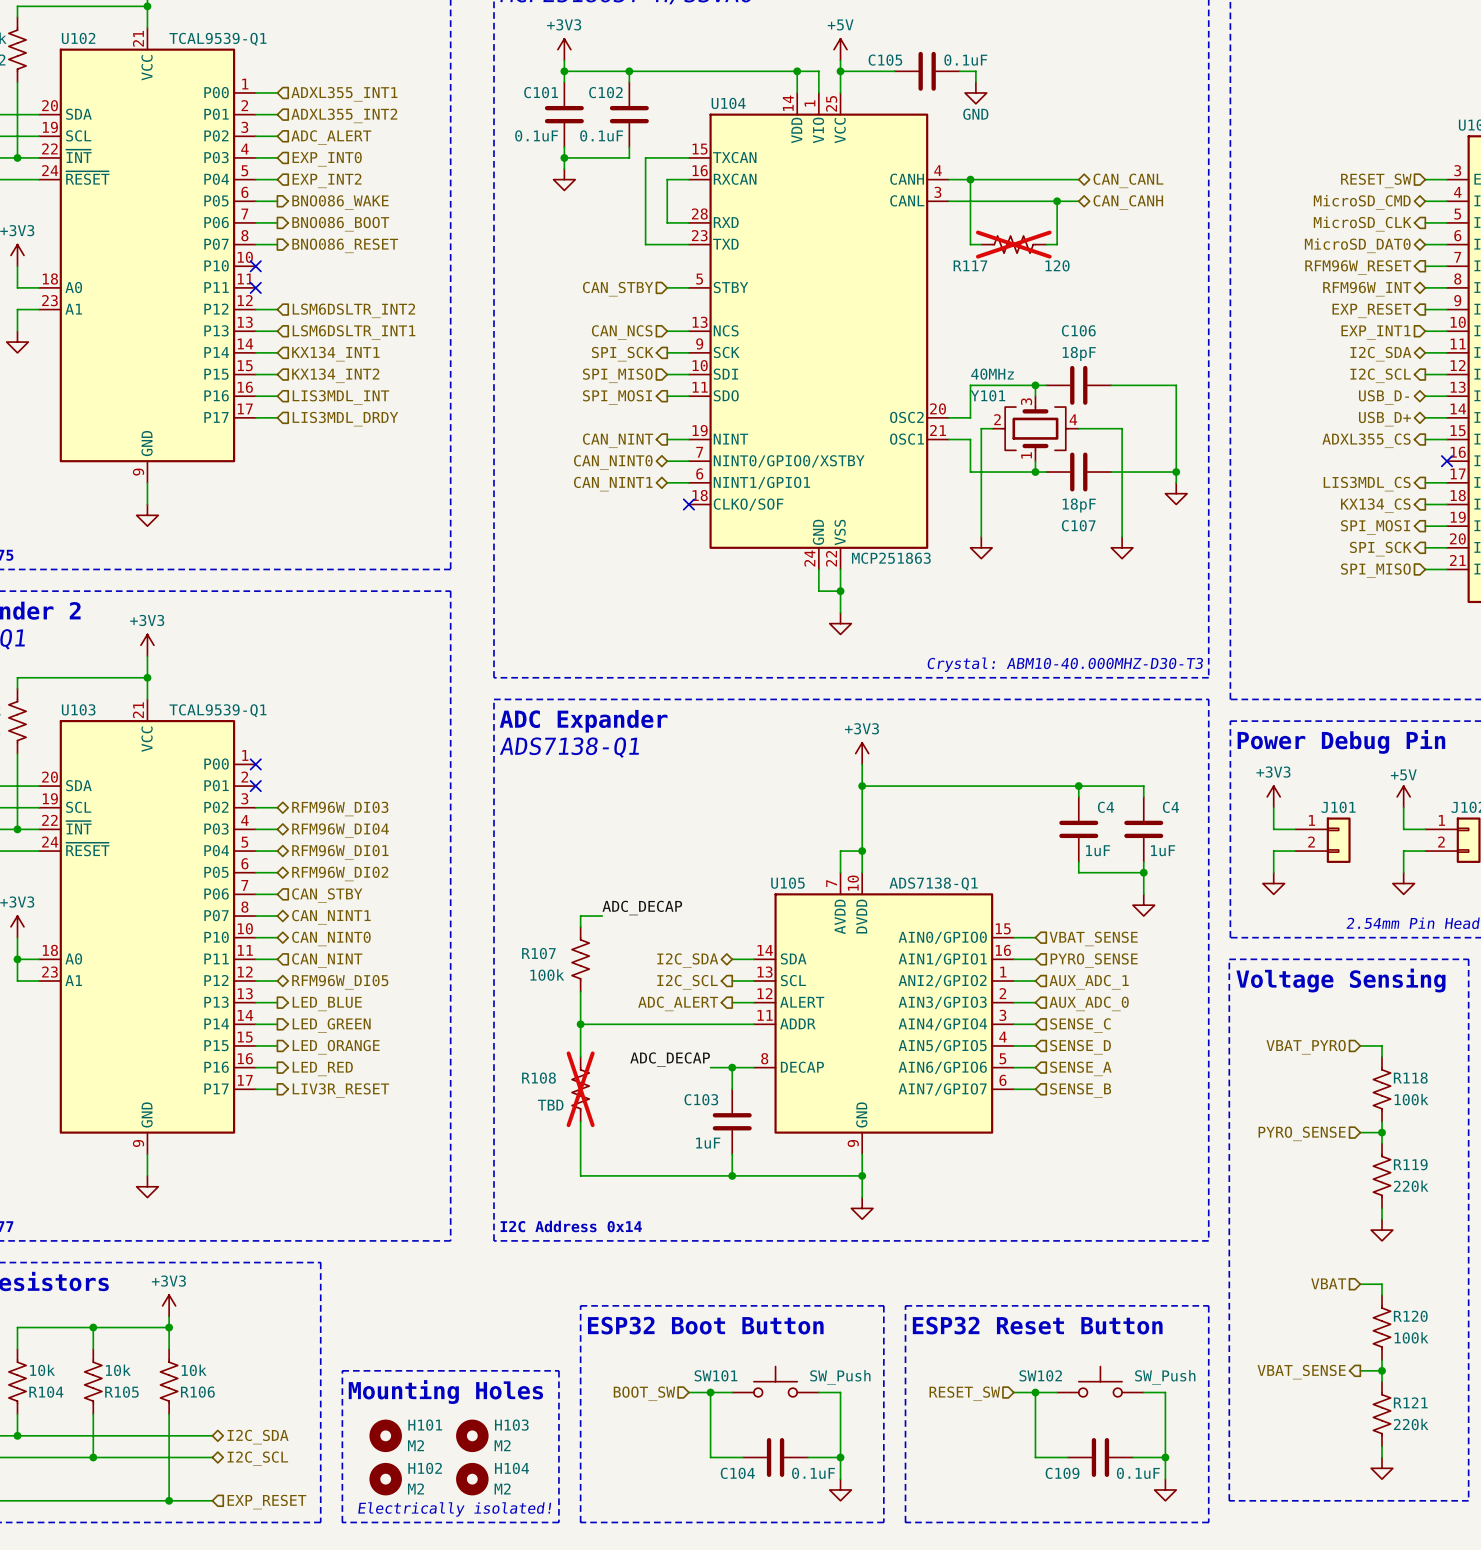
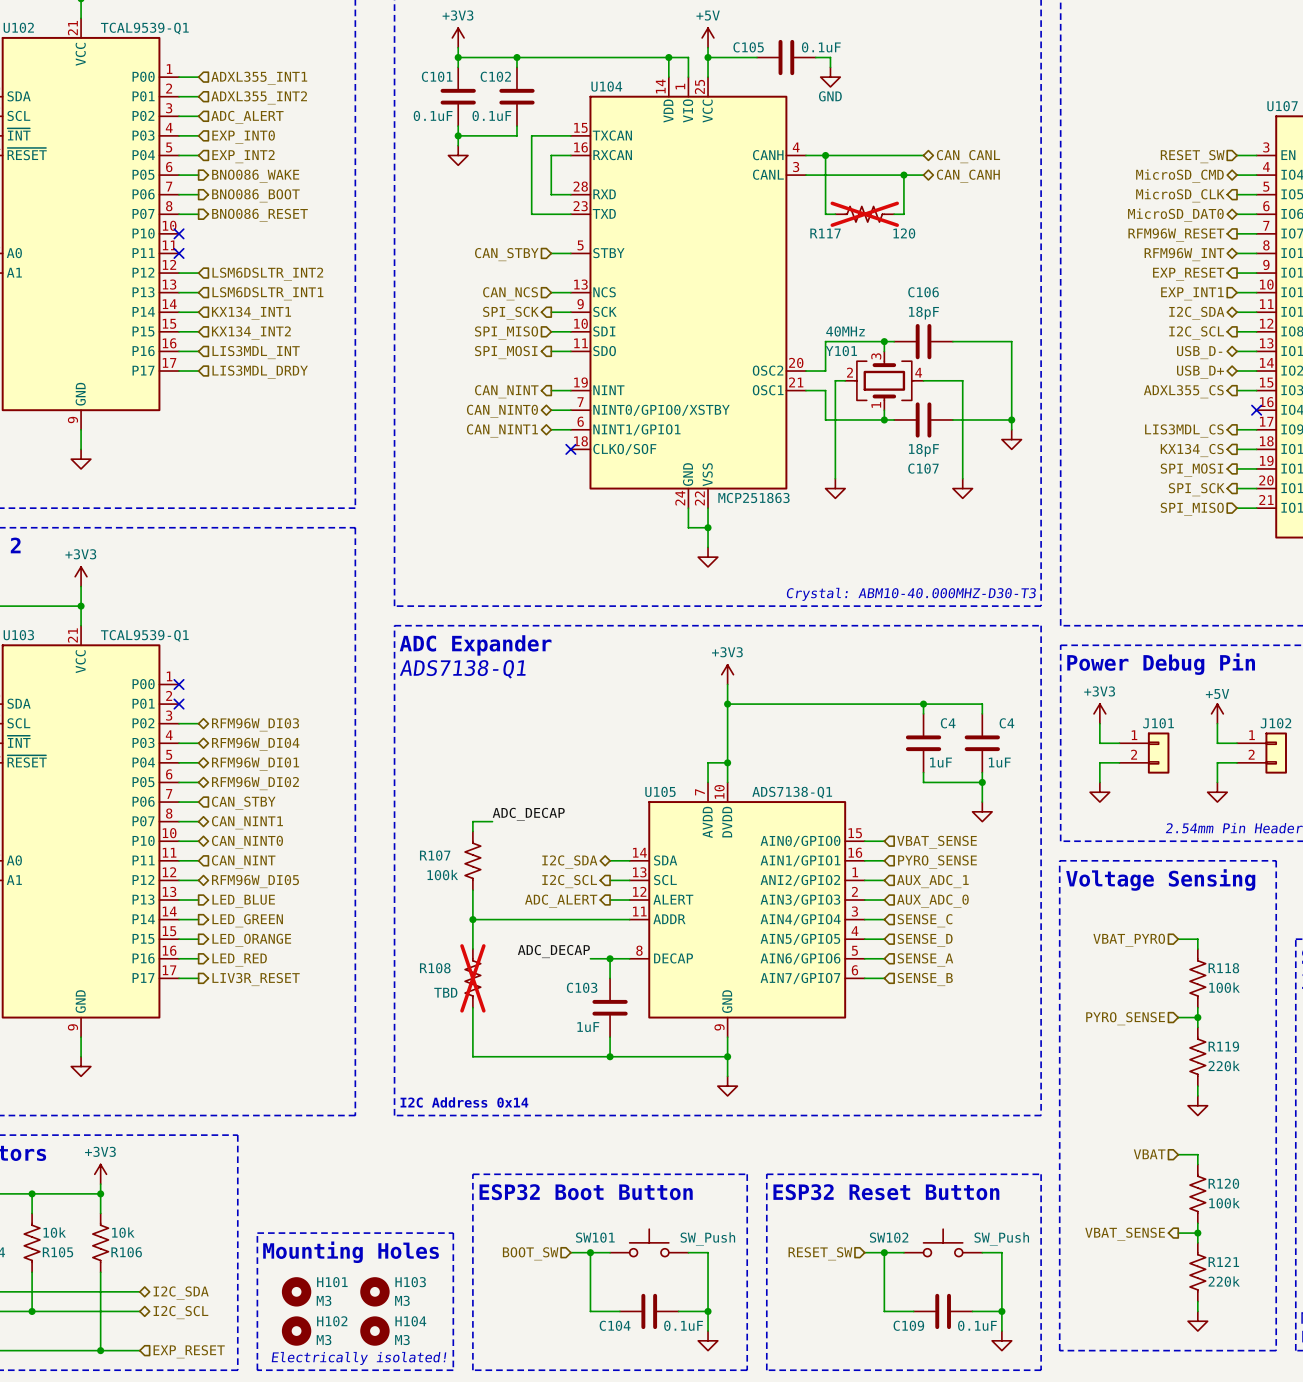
H101 value: M2 (415, 1445) -> M3 (324, 1300)
H103 value: M2 (502, 1445) -> M3 (402, 1300)
H102 value: M2 (415, 1488) -> M3 (324, 1340)
H104 value: M2 (502, 1488) -> M3 (402, 1340)

